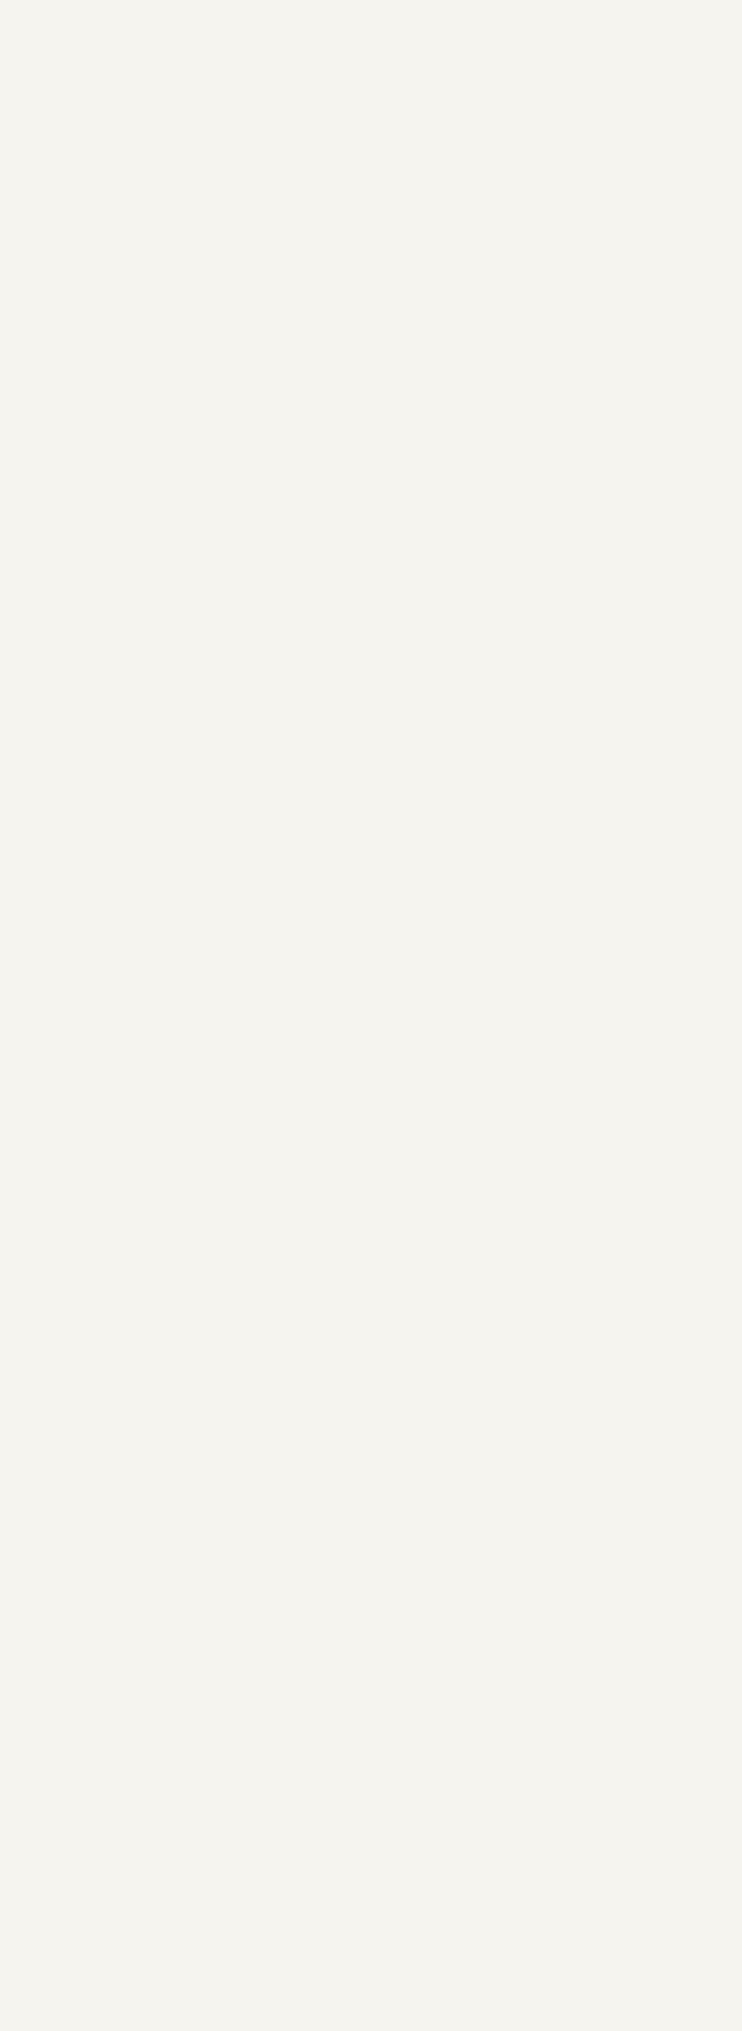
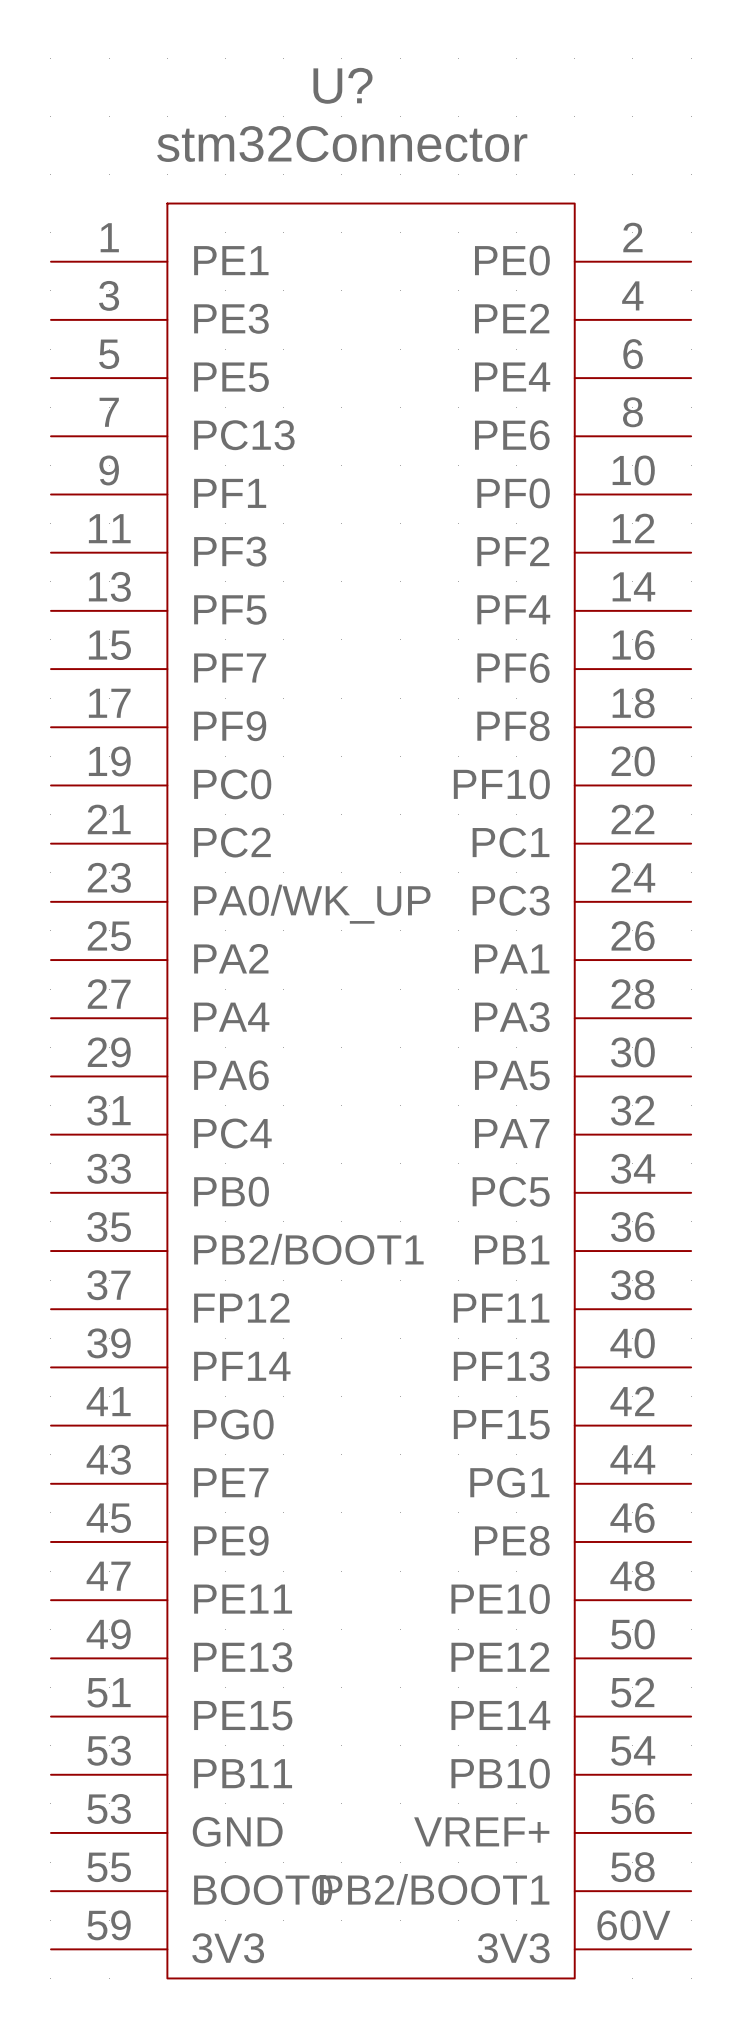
U?: none -> stm32Connector (371, 1090)

